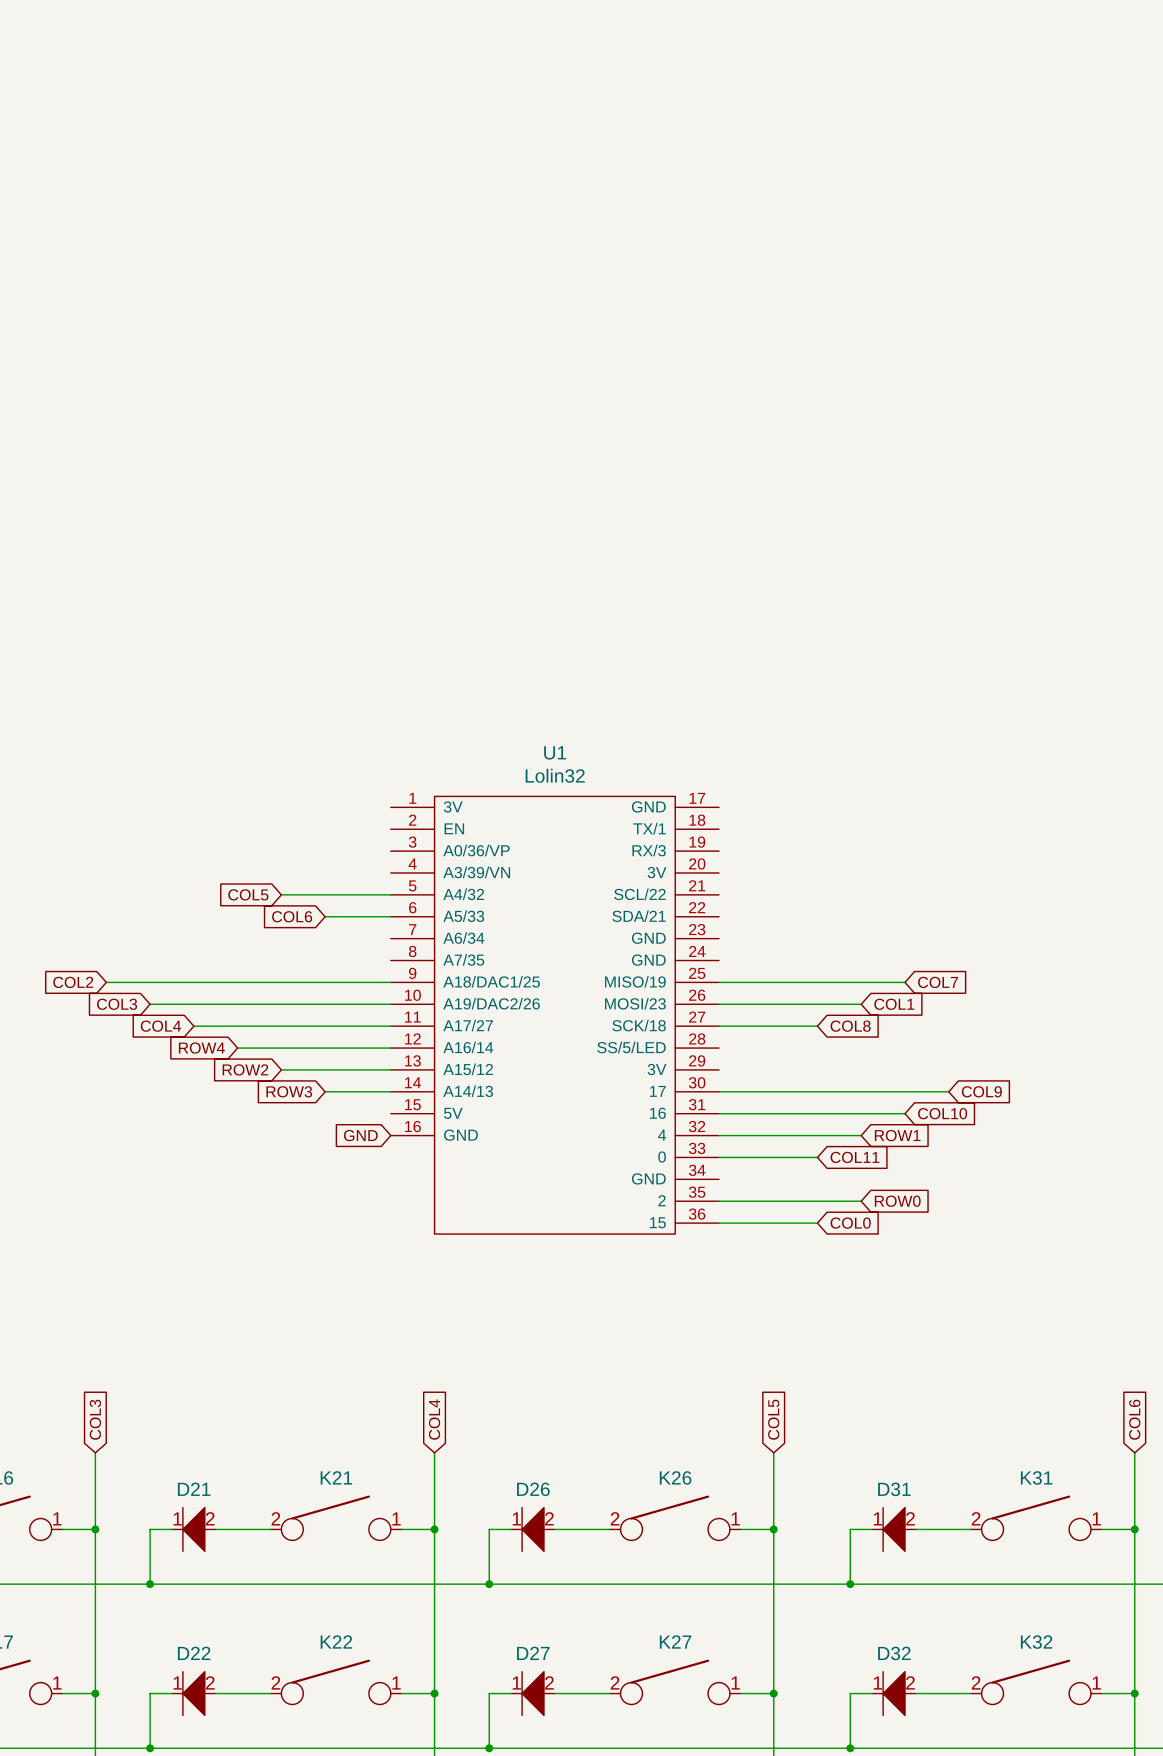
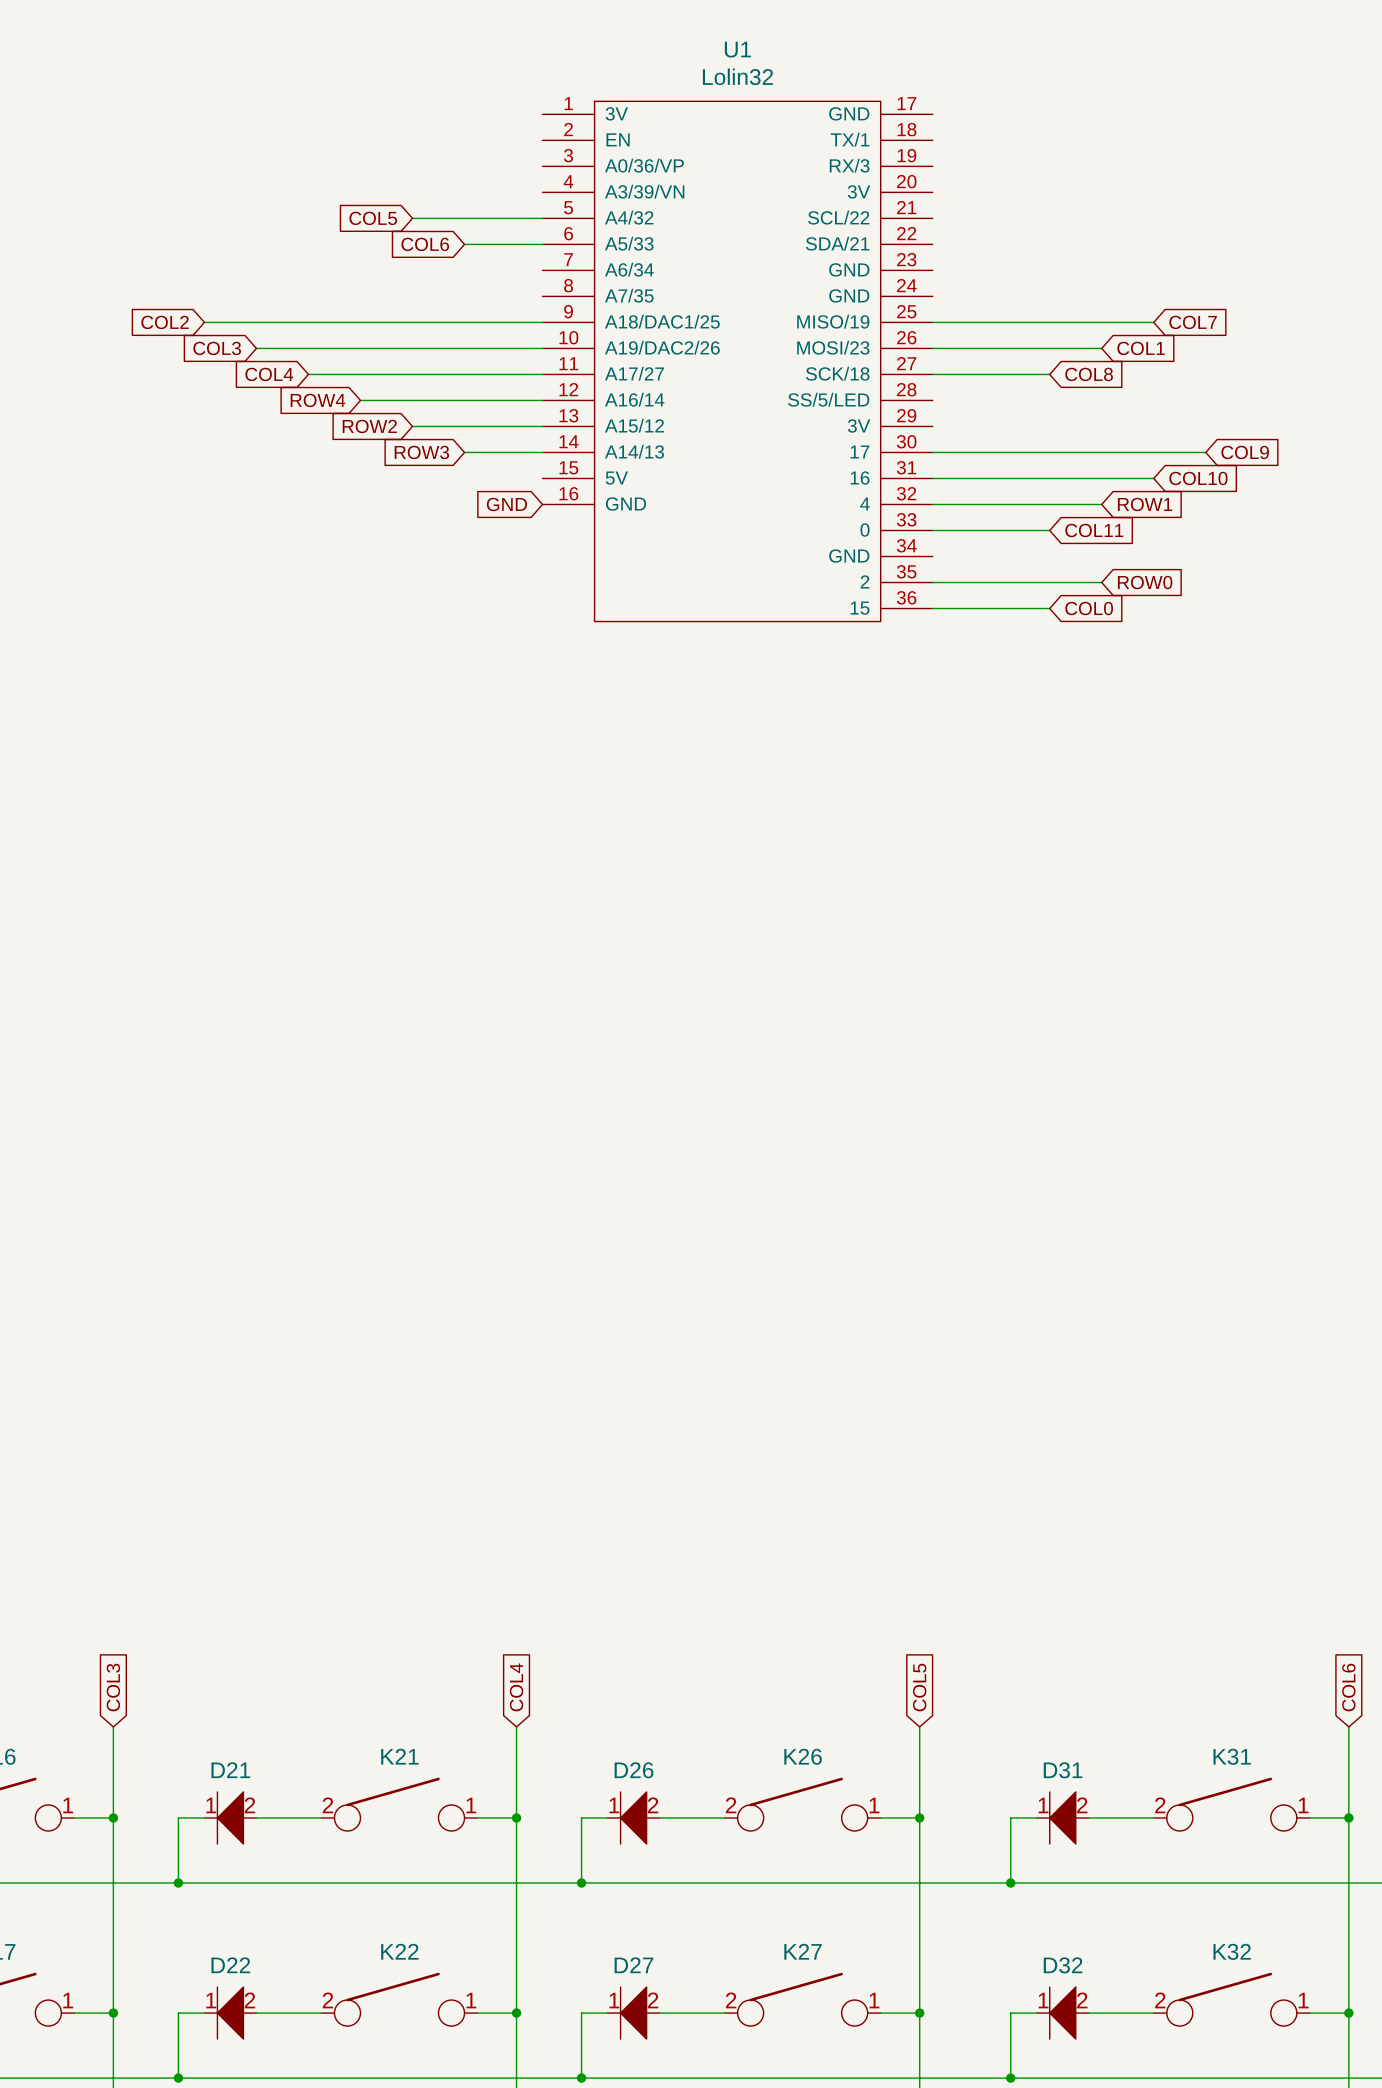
global label: none -> COL5 (373, 218)
wire: none -> (412, 218) (542, 218)
global label: none -> COL6 (425, 244)
wire: none -> (464, 244) (542, 244)
global label: none -> COL2 (165, 322)
wire: none -> (204, 322) (542, 322)
wire: none -> (932, 322) (1153, 322)
global label: none -> COL7 (1193, 322)
global label: none -> COL3 (217, 348)
wire: none -> (256, 348) (542, 348)
wire: none -> (932, 348) (1101, 348)
global label: none -> COL1 (1141, 348)
global label: none -> COL4 (269, 374)
wire: none -> (308, 374) (542, 374)
wire: none -> (932, 374) (1049, 374)
global label: none -> COL8 (1089, 374)
global label: none -> ROW4 (317, 400)
wire: none -> (360, 400) (542, 400)
global label: none -> ROW2 (369, 426)
wire: none -> (412, 426) (542, 426)
global label: none -> ROW3 (421, 452)
wire: none -> (464, 452) (542, 452)
wire: none -> (932, 452) (1205, 452)
global label: none -> COL9 (1245, 452)
wire: none -> (932, 478) (1153, 478)
global label: none -> COL10 (1198, 478)
global label: none -> GND (506, 504)
wire: none -> (932, 504) (1101, 504)
global label: none -> ROW1 (1145, 504)
wire: none -> (932, 530) (1049, 530)
global label: none -> COL11 (1094, 530)
wire: none -> (932, 582) (1101, 582)
global label: none -> ROW0 (1145, 582)
wire: none -> (932, 608) (1049, 608)
global label: none -> COL0 (1089, 608)
global label: COL5 (248, 894) -> none
wire: (281, 894) (390, 894) -> none
global label: COL6 (292, 916) -> none
wire: (325, 916) (390, 916) -> none
global label: COL2 (73, 982) -> none
wire: (106, 982) (390, 982) -> none
wire: (719, 982) (905, 982) -> none
global label: COL7 (938, 982) -> none
global label: COL3 (117, 1004) -> none
wire: (150, 1004) (390, 1004) -> none
wire: (719, 1004) (861, 1004) -> none
global label: COL1 (894, 1004) -> none
U1 position: (554, 1015) -> (737, 361)
global label: COL4 (160, 1026) -> none
wire: (193, 1026) (390, 1026) -> none
wire: (719, 1026) (817, 1026) -> none
global label: COL8 (850, 1026) -> none
global label: ROW4 (201, 1048) -> none
wire: (237, 1048) (390, 1048) -> none
global label: ROW2 (245, 1069) -> none
wire: (281, 1069) (390, 1069) -> none
global label: ROW3 (289, 1091) -> none
wire: (325, 1091) (390, 1091) -> none
wire: (719, 1091) (948, 1091) -> none
global label: COL9 (981, 1091) -> none
wire: (719, 1113) (905, 1113) -> none
global label: COL10 (942, 1113) -> none
global label: GND (360, 1135) -> none
wire: (719, 1135) (861, 1135) -> none
global label: ROW1 (897, 1135) -> none
wire: (719, 1157) (817, 1157) -> none
global label: COL11 (855, 1157) -> none
wire: (719, 1201) (861, 1201) -> none
global label: ROW0 (897, 1201) -> none
wire: (719, 1223) (817, 1223) -> none
global label: COL0 (850, 1223) -> none

